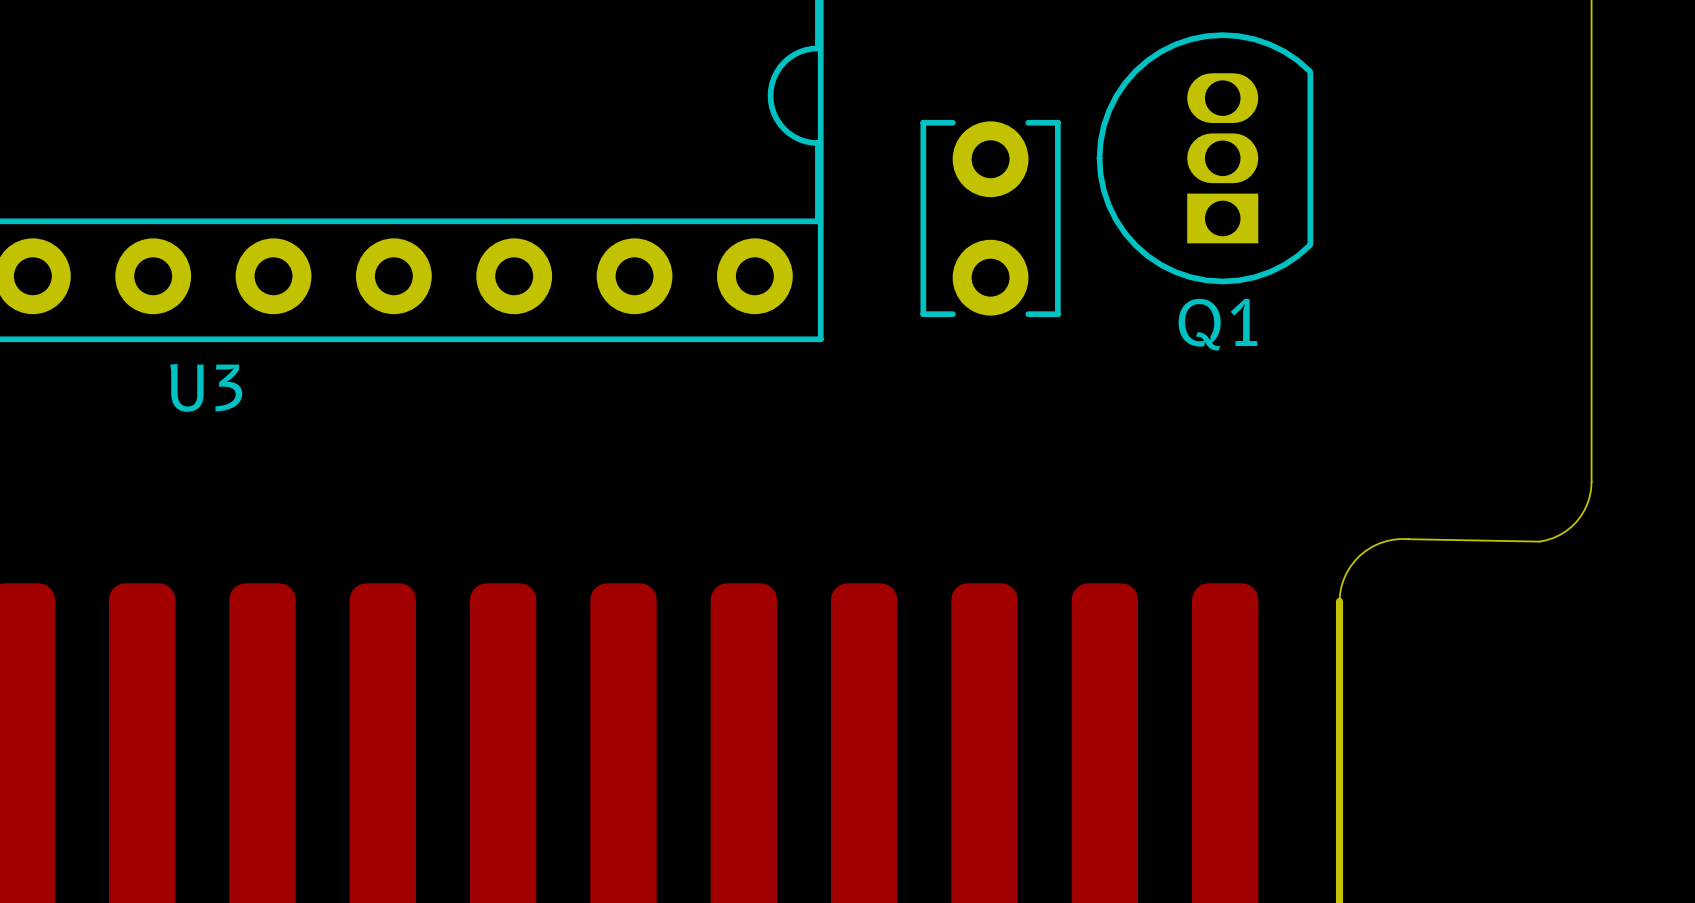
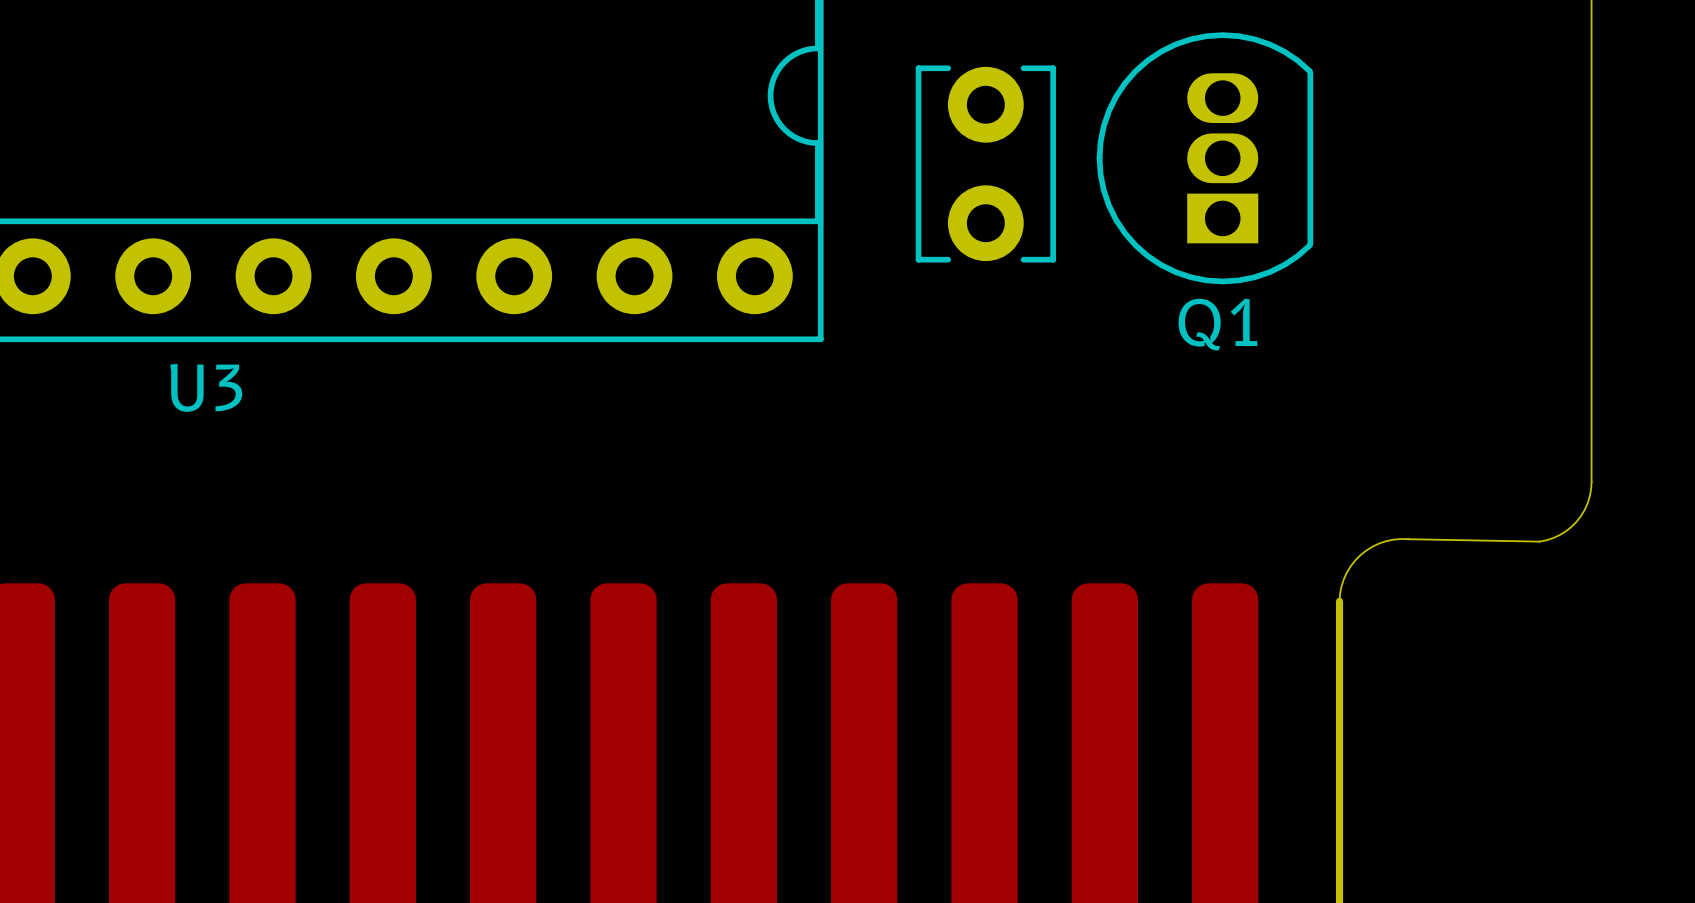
part position: (990, 218) -> (985, 163)

